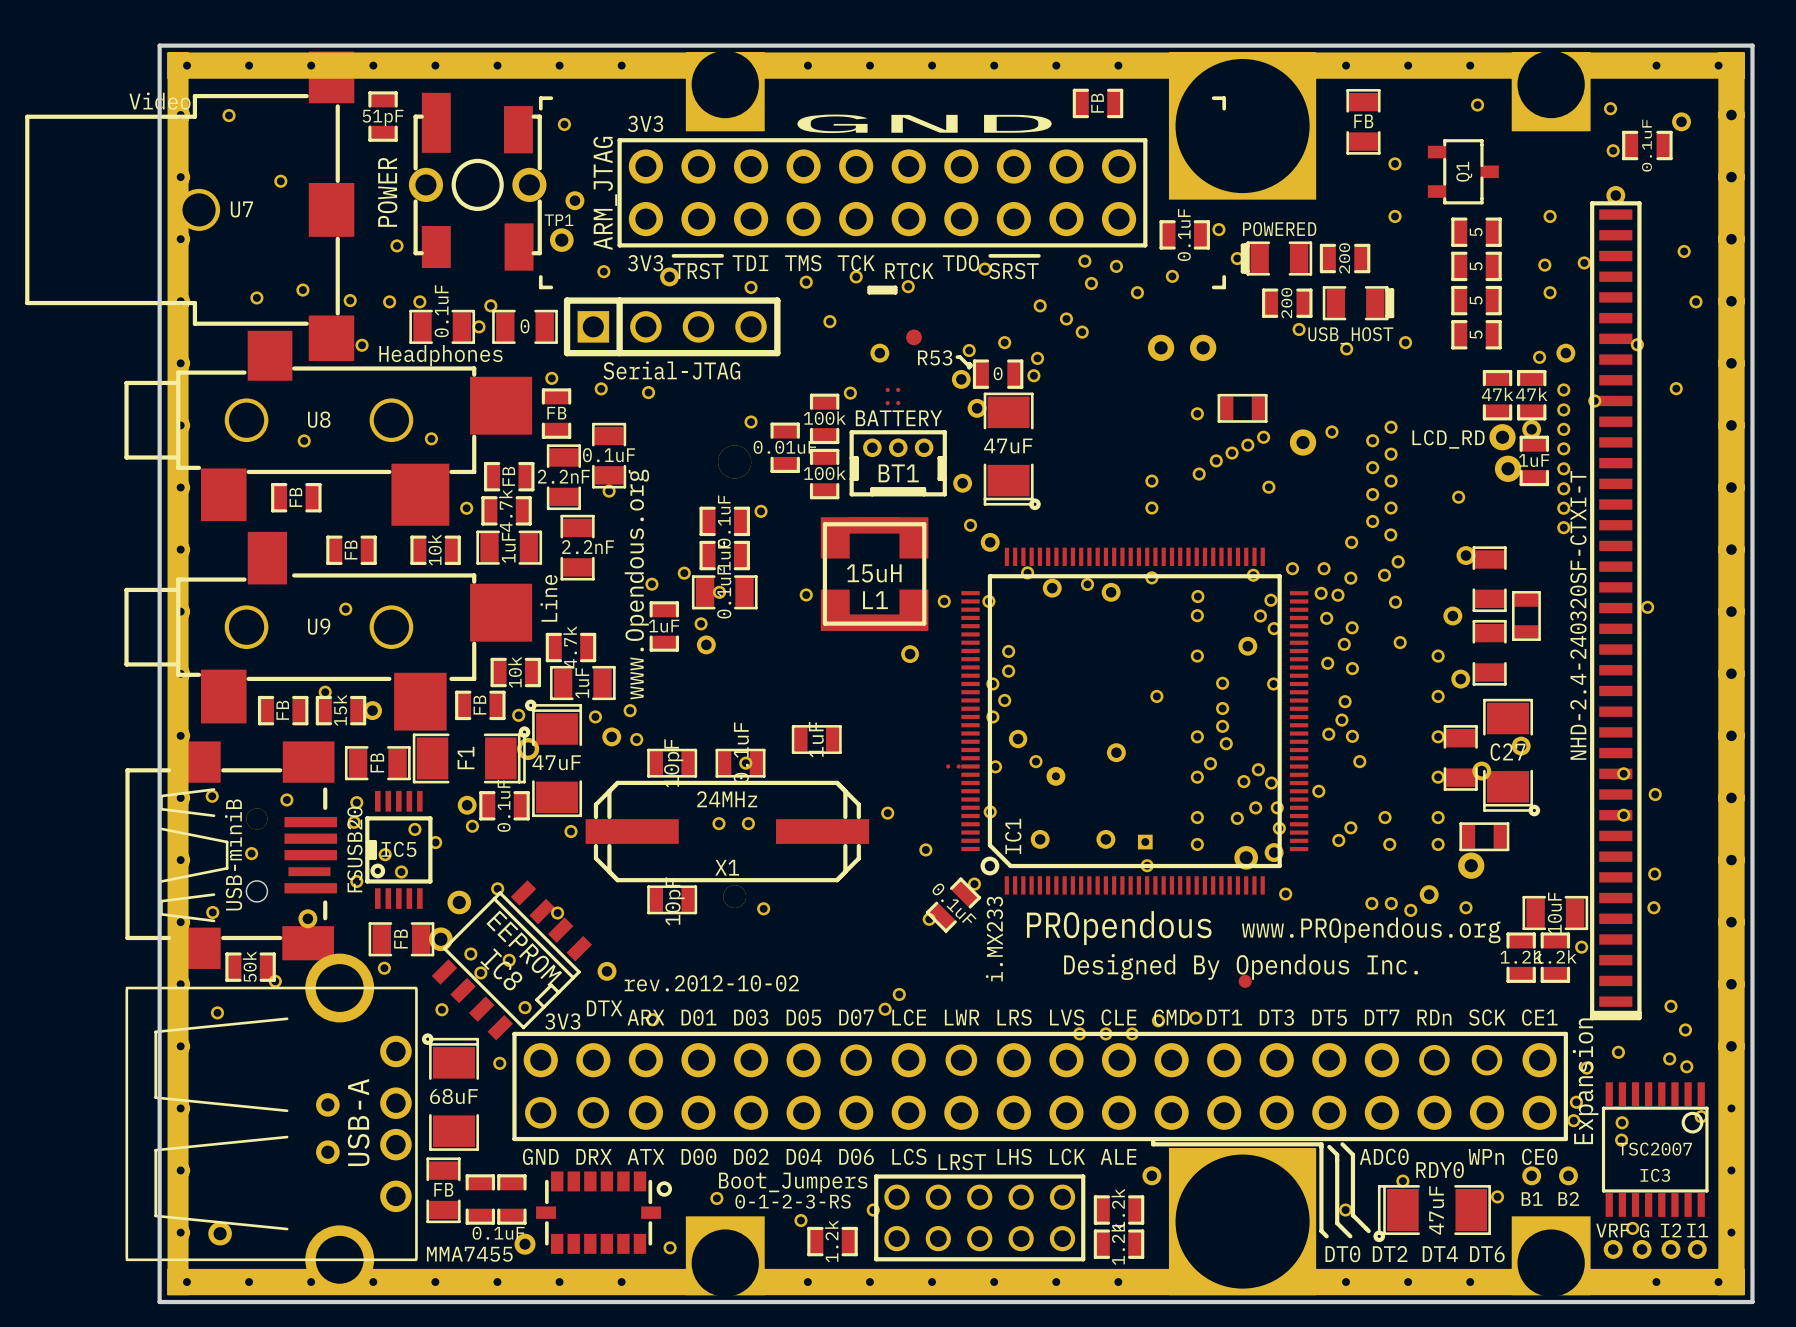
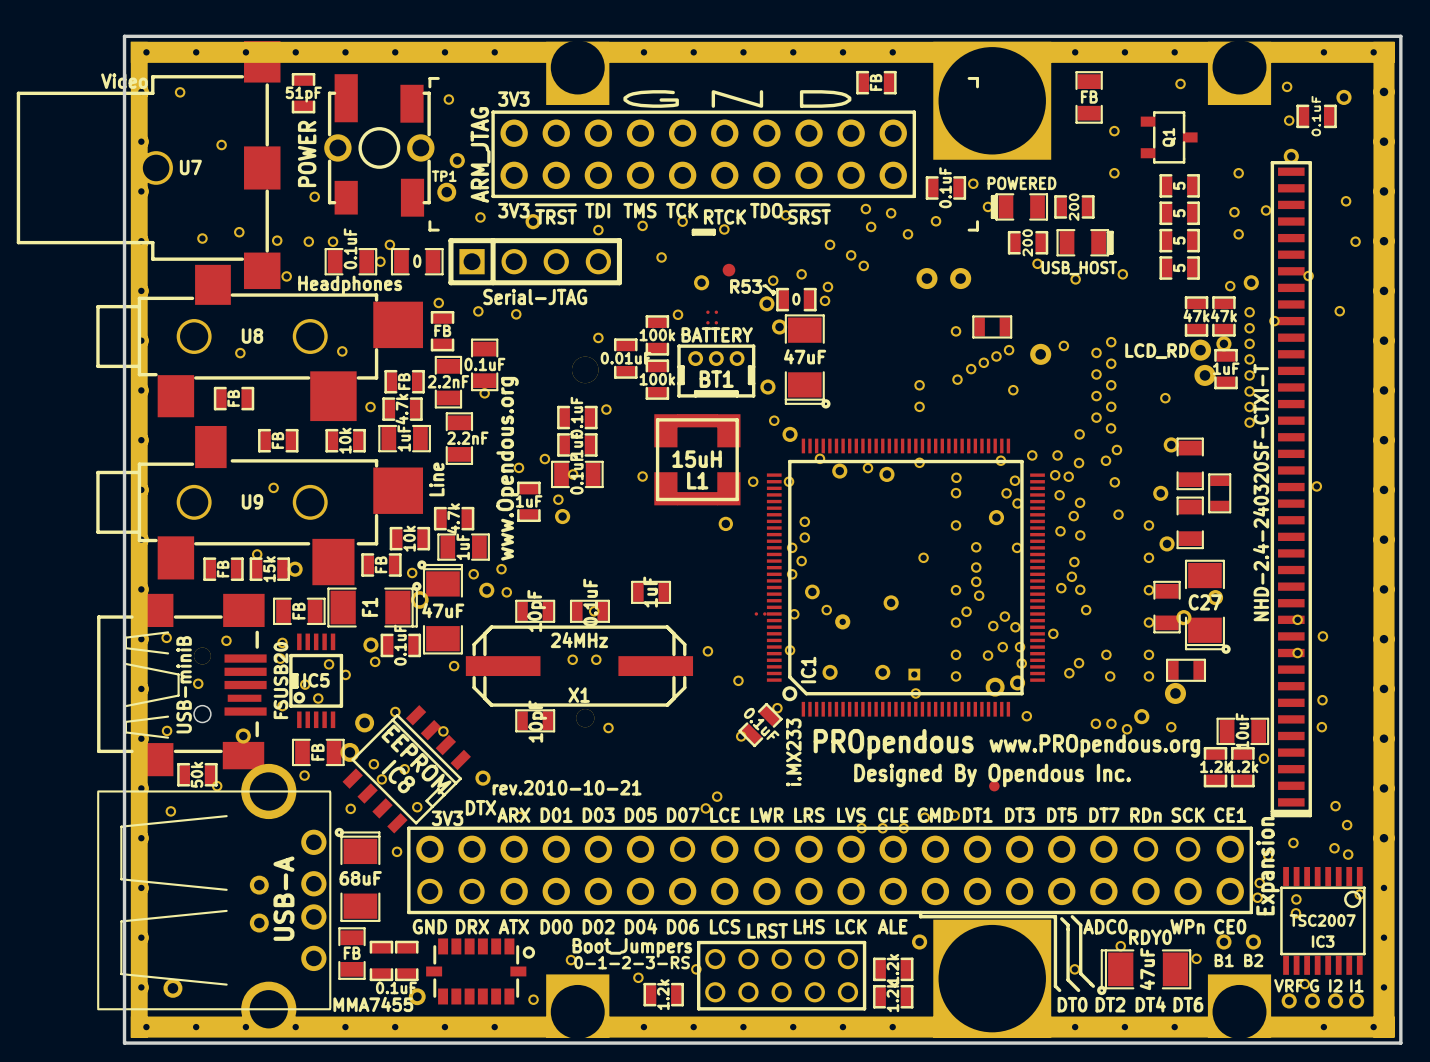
text: rev.2012-10-02 (711, 983) -> rev.2010-10-21 (567, 787)

